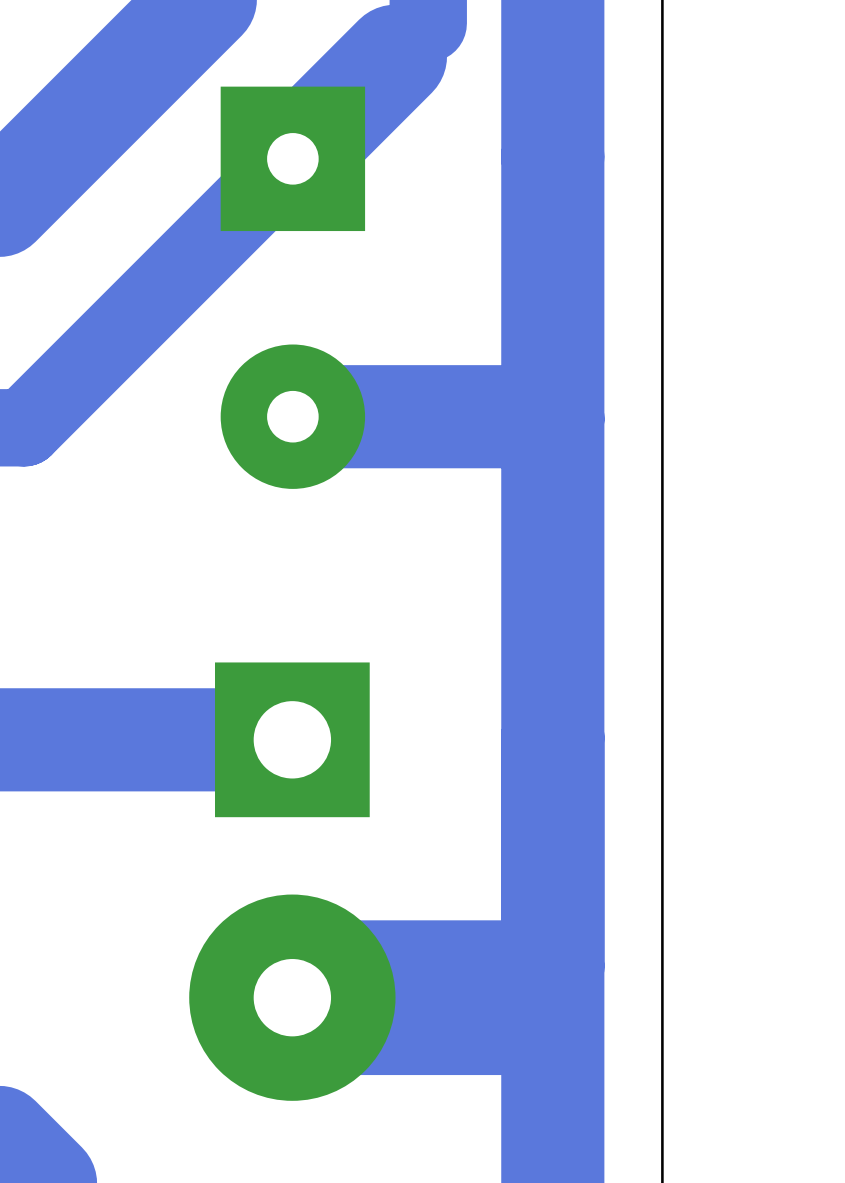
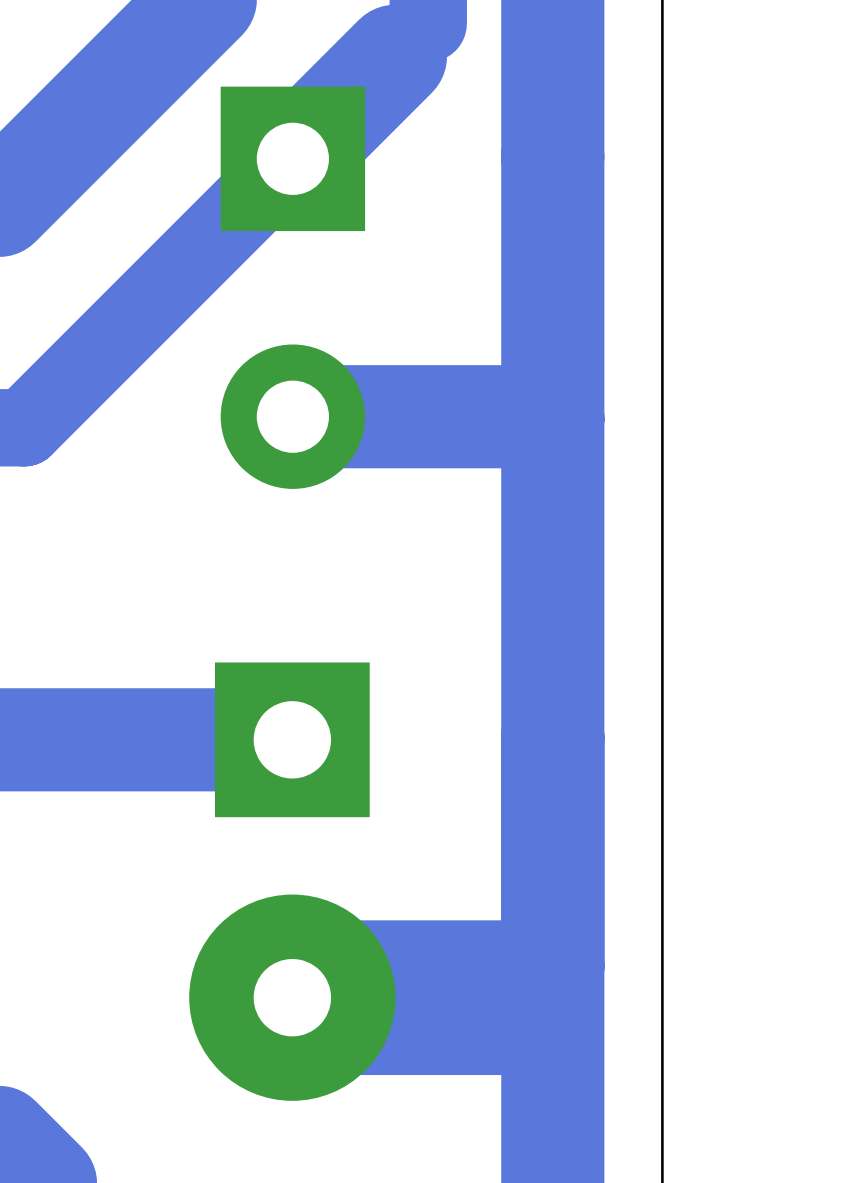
part footprint: [220, 86, 366, 489] -> [220, 86, 366, 489]

